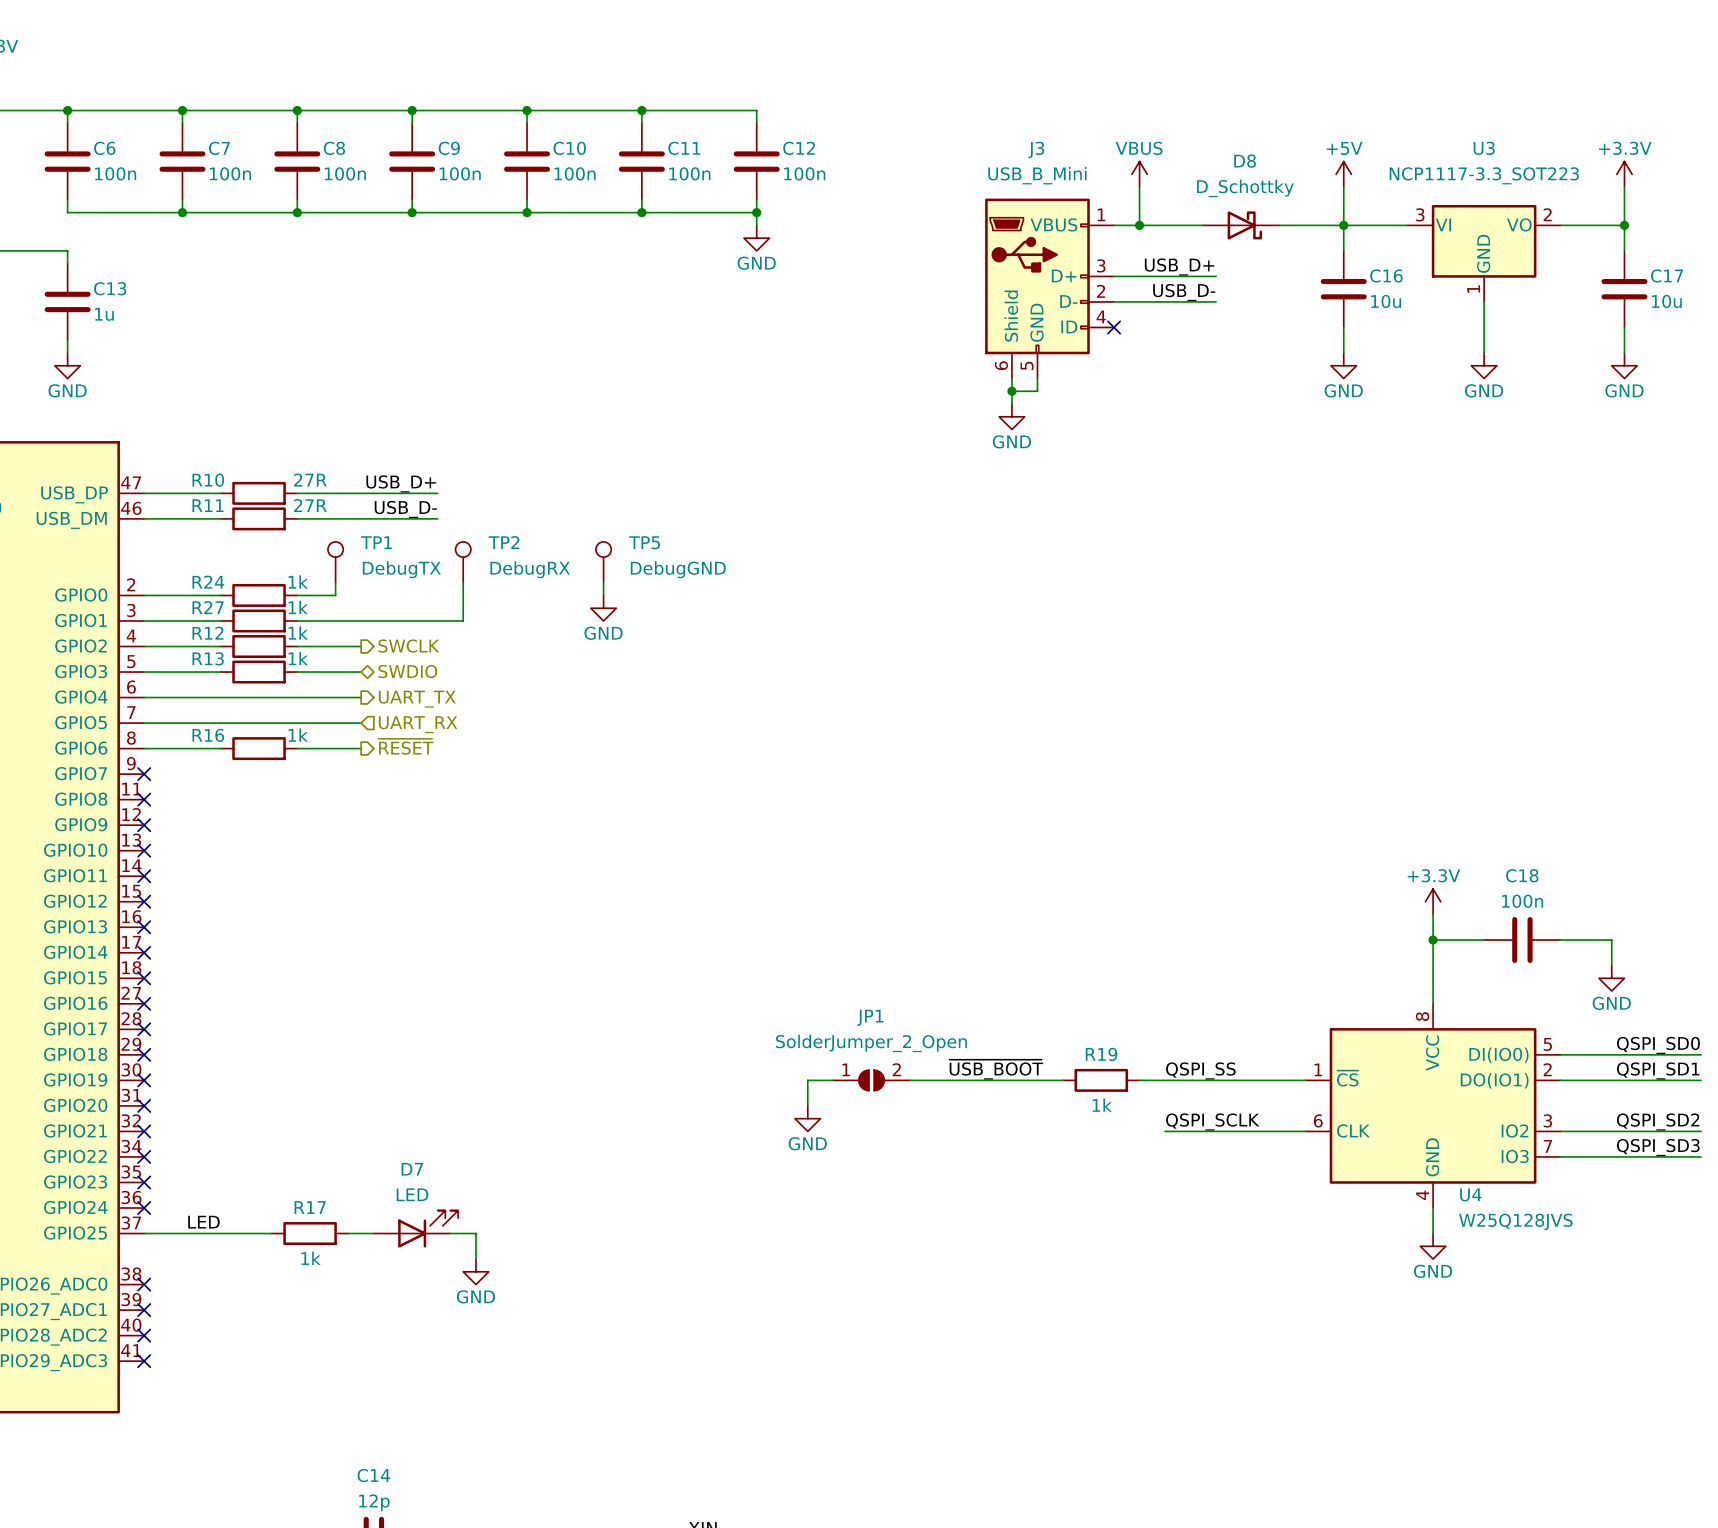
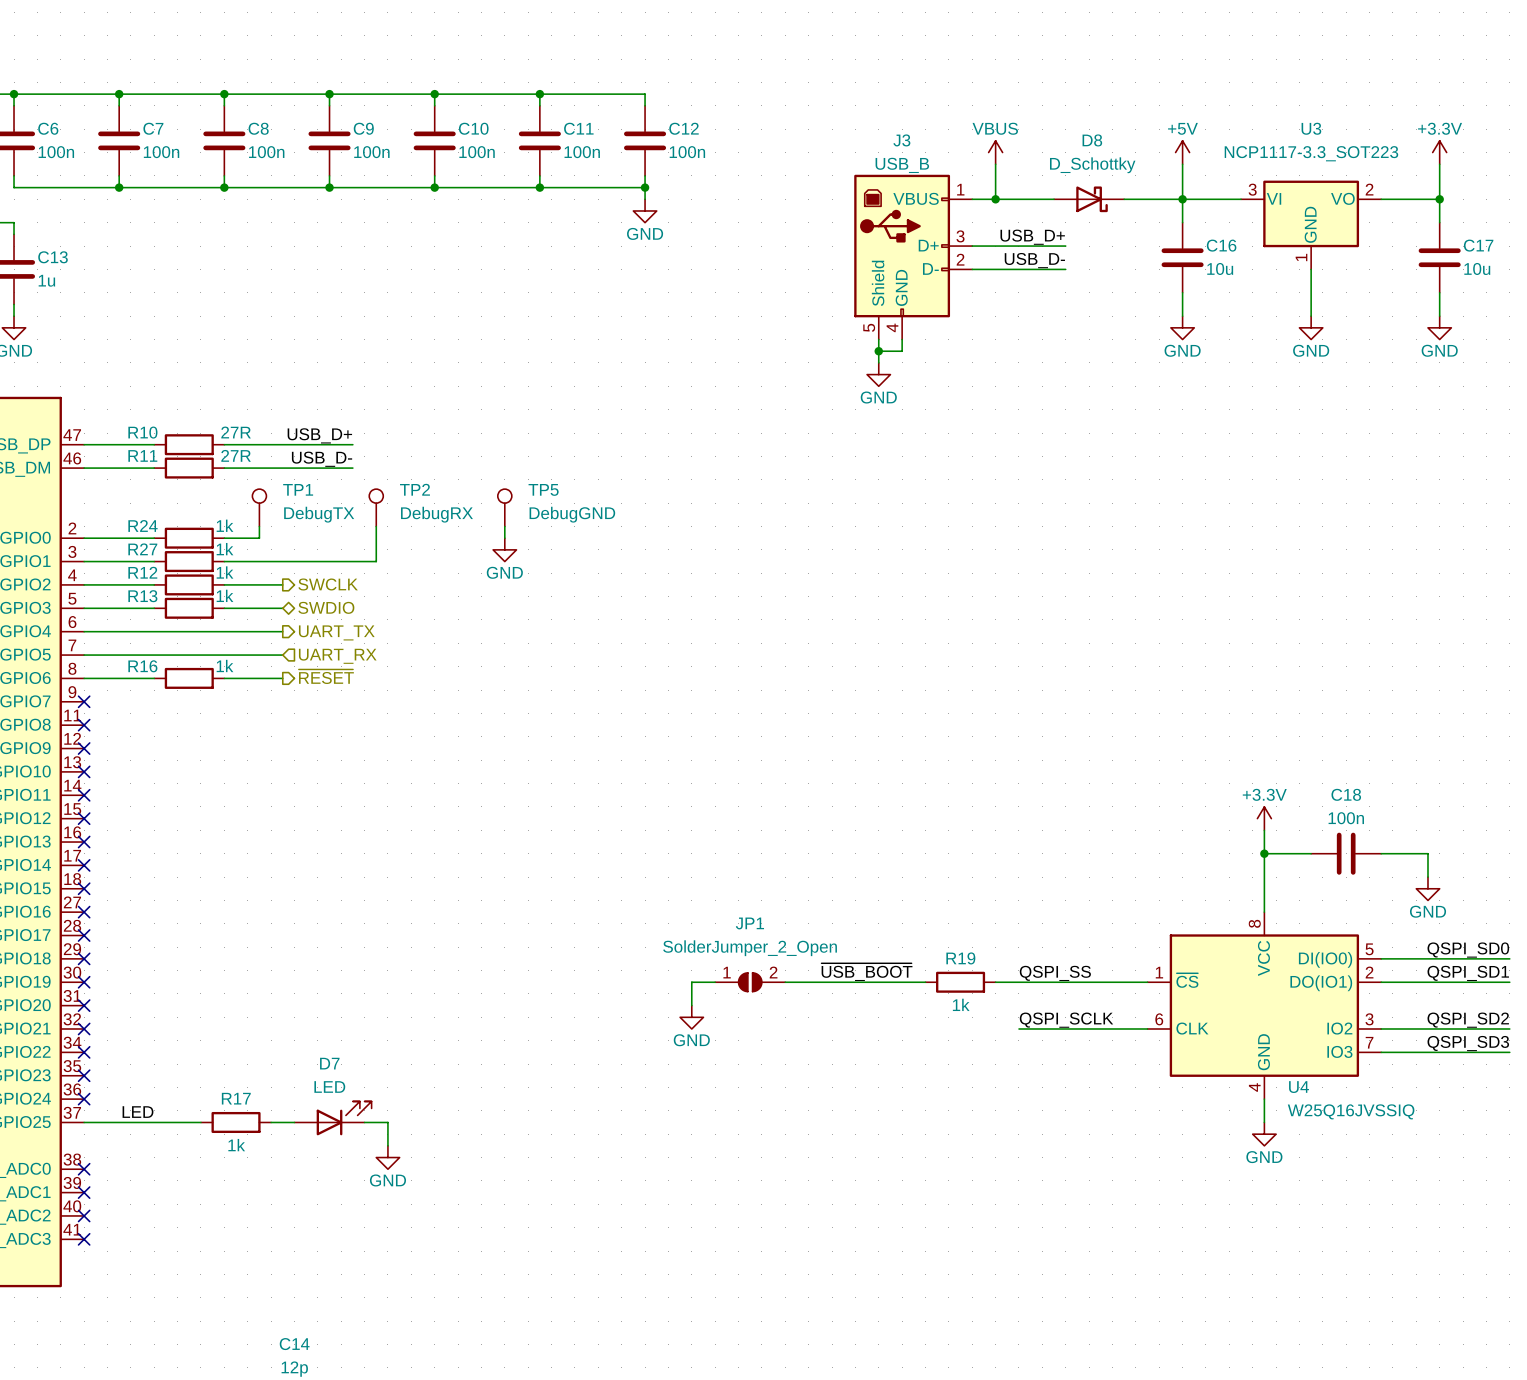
J3 value: USB_B_Mini (1037, 175) -> USB_B (902, 165)
J3 symbol: [985, 198, 1115, 379] -> [854, 174, 973, 340]
no-connect mark: (1114, 327) -> none
U4 value: W25Q128JVS (1515, 1221) -> W25Q16JVSSIQ (1351, 1111)

